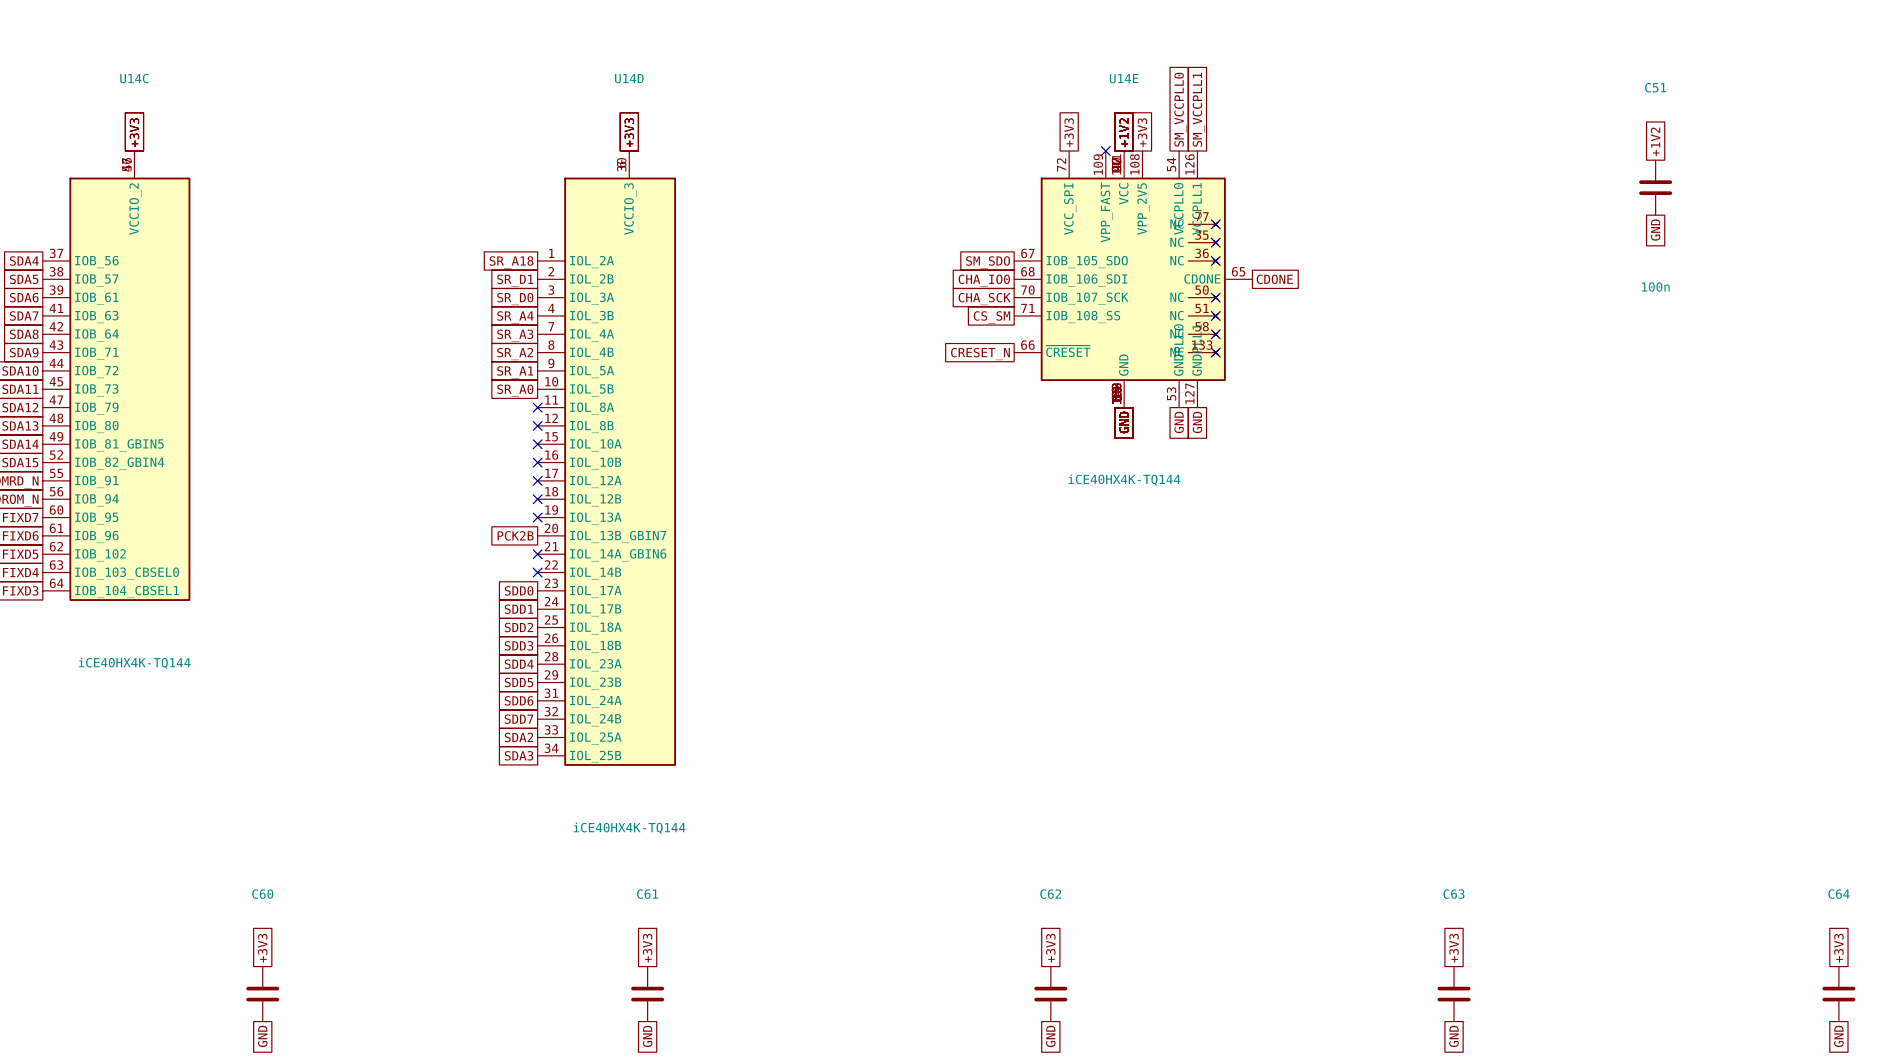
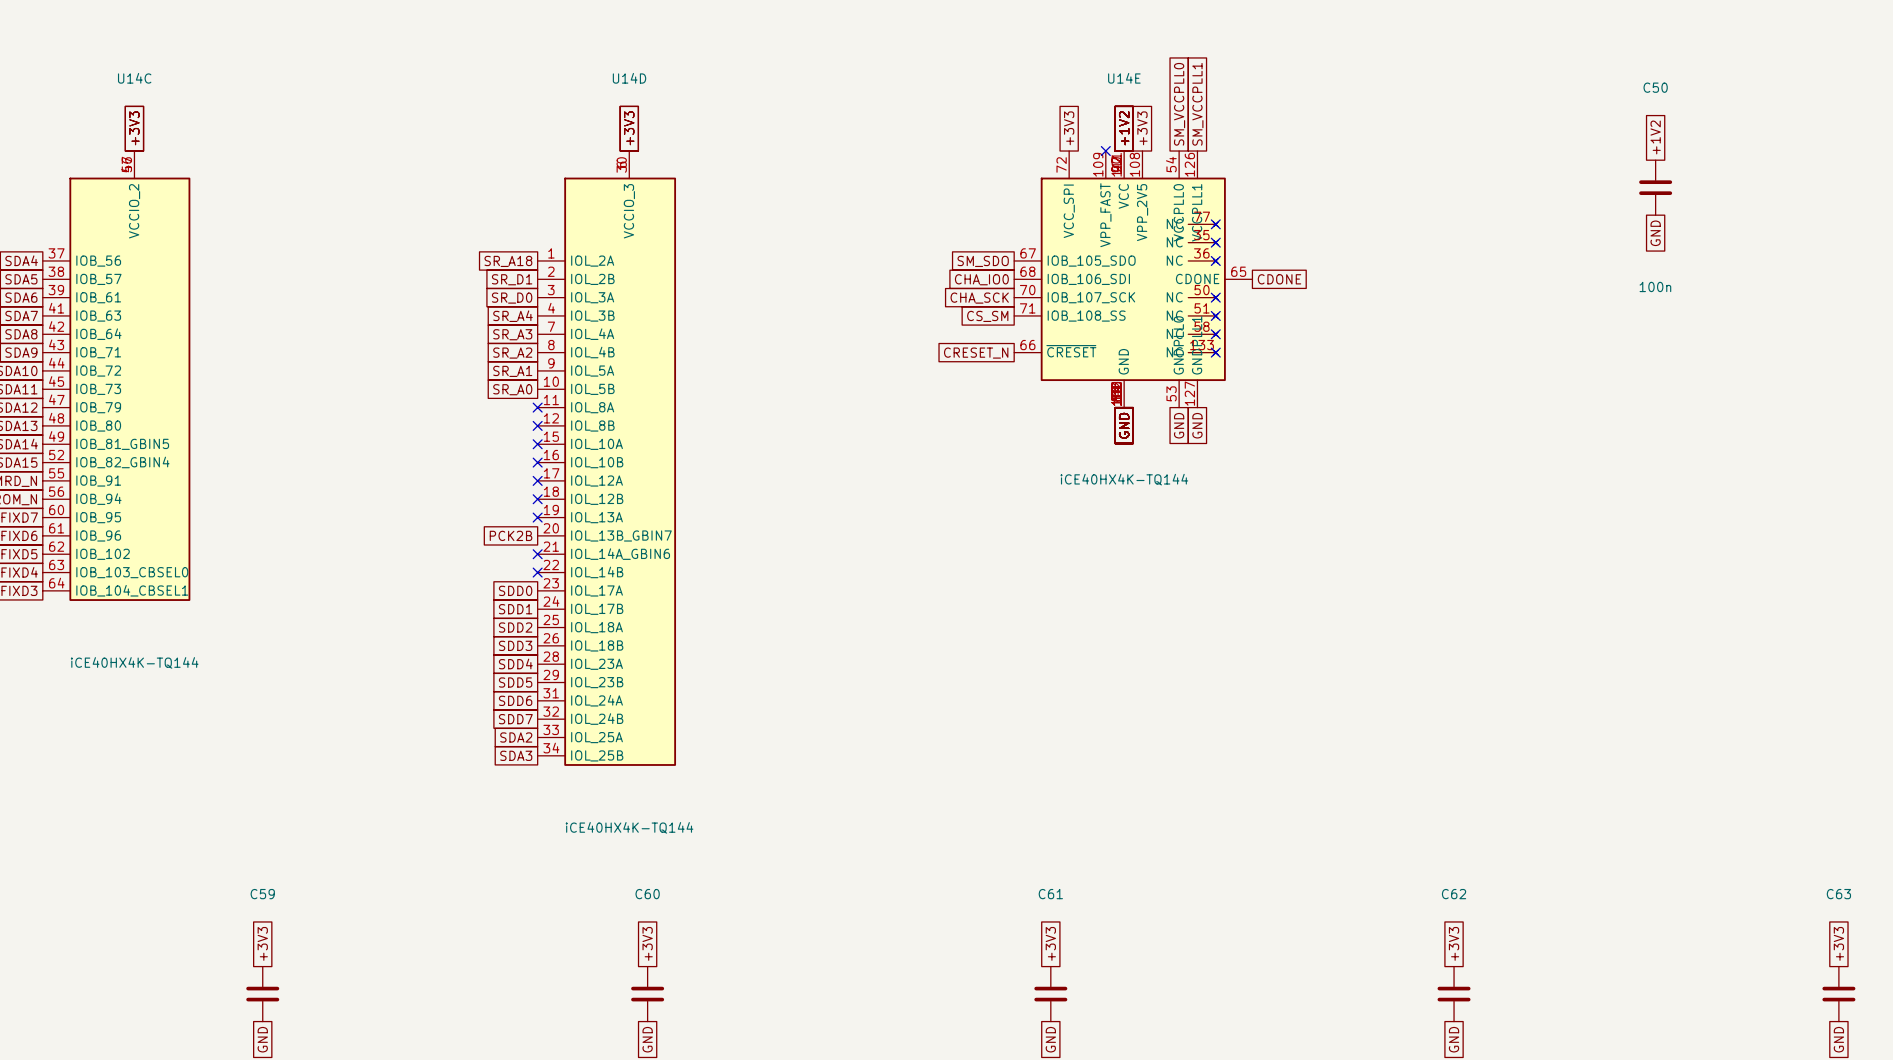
C51 name: C51 (1655, 87) -> C50 (1655, 87)
C60 name: C60 (262, 894) -> C59 (262, 894)
C61 name: C61 (647, 894) -> C60 (647, 894)
C62 name: C62 (1050, 894) -> C61 (1050, 894)
C63 name: C63 (1453, 894) -> C62 (1454, 894)
C64 name: C64 (1839, 894) -> C63 (1838, 894)

